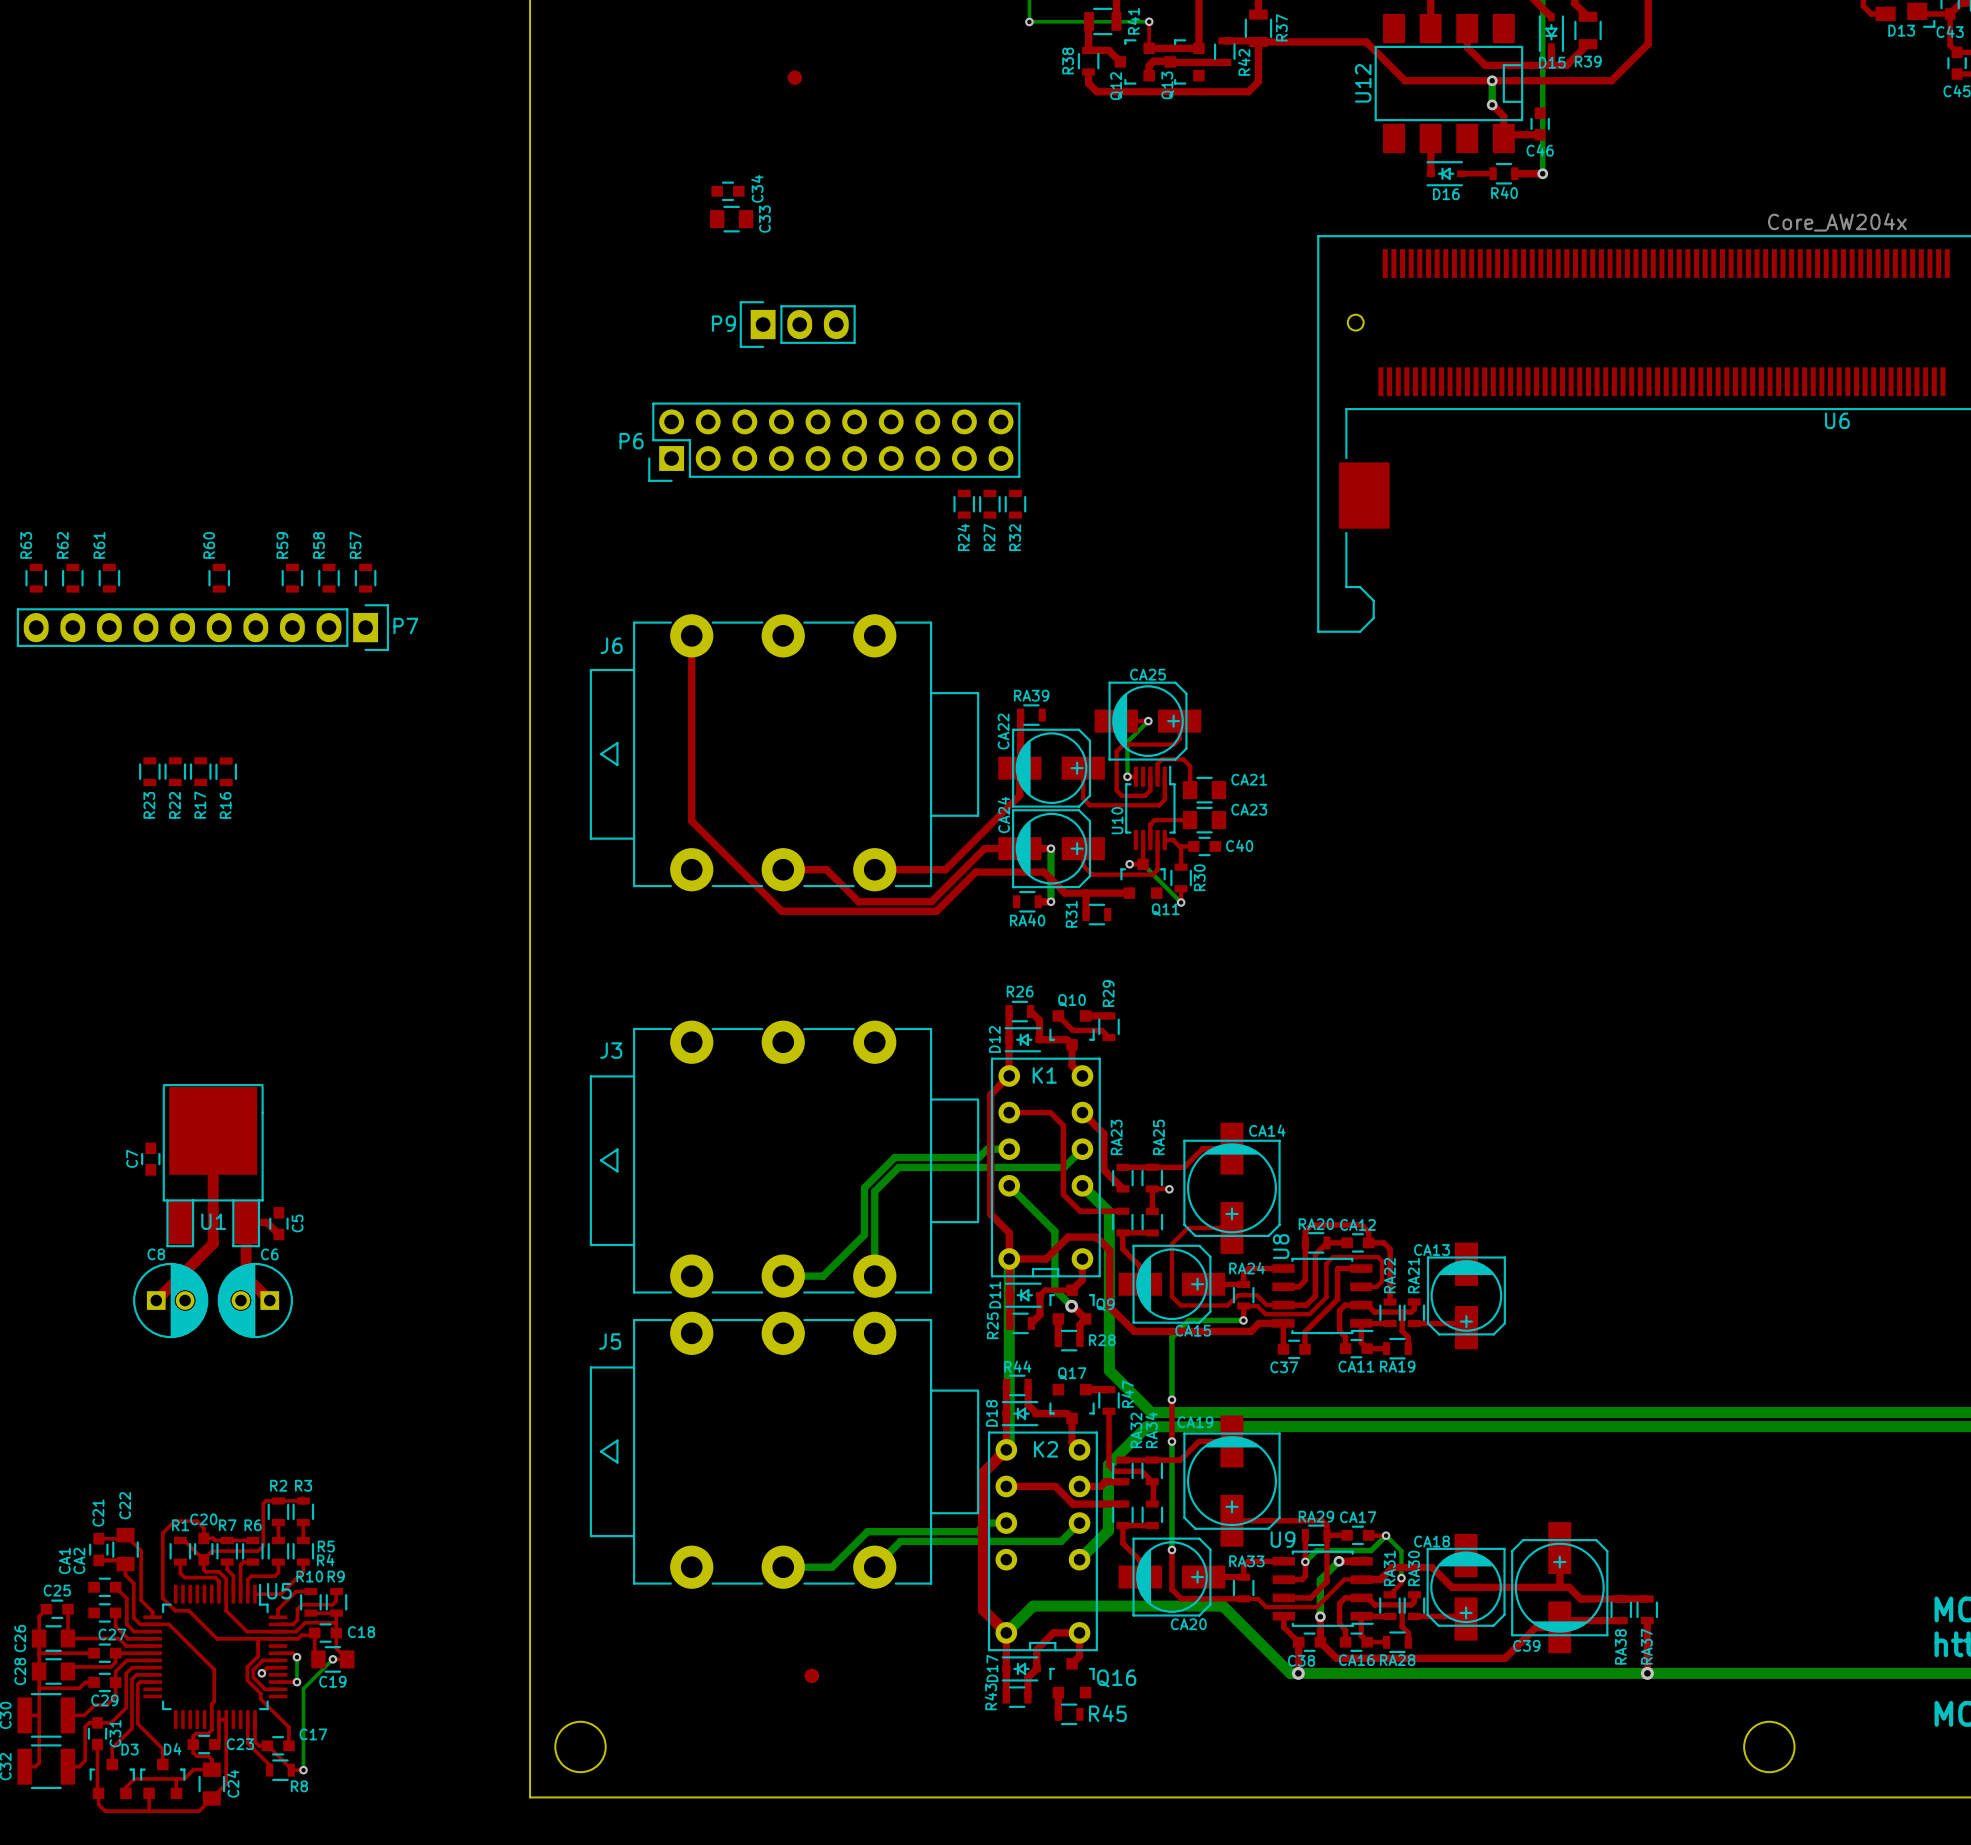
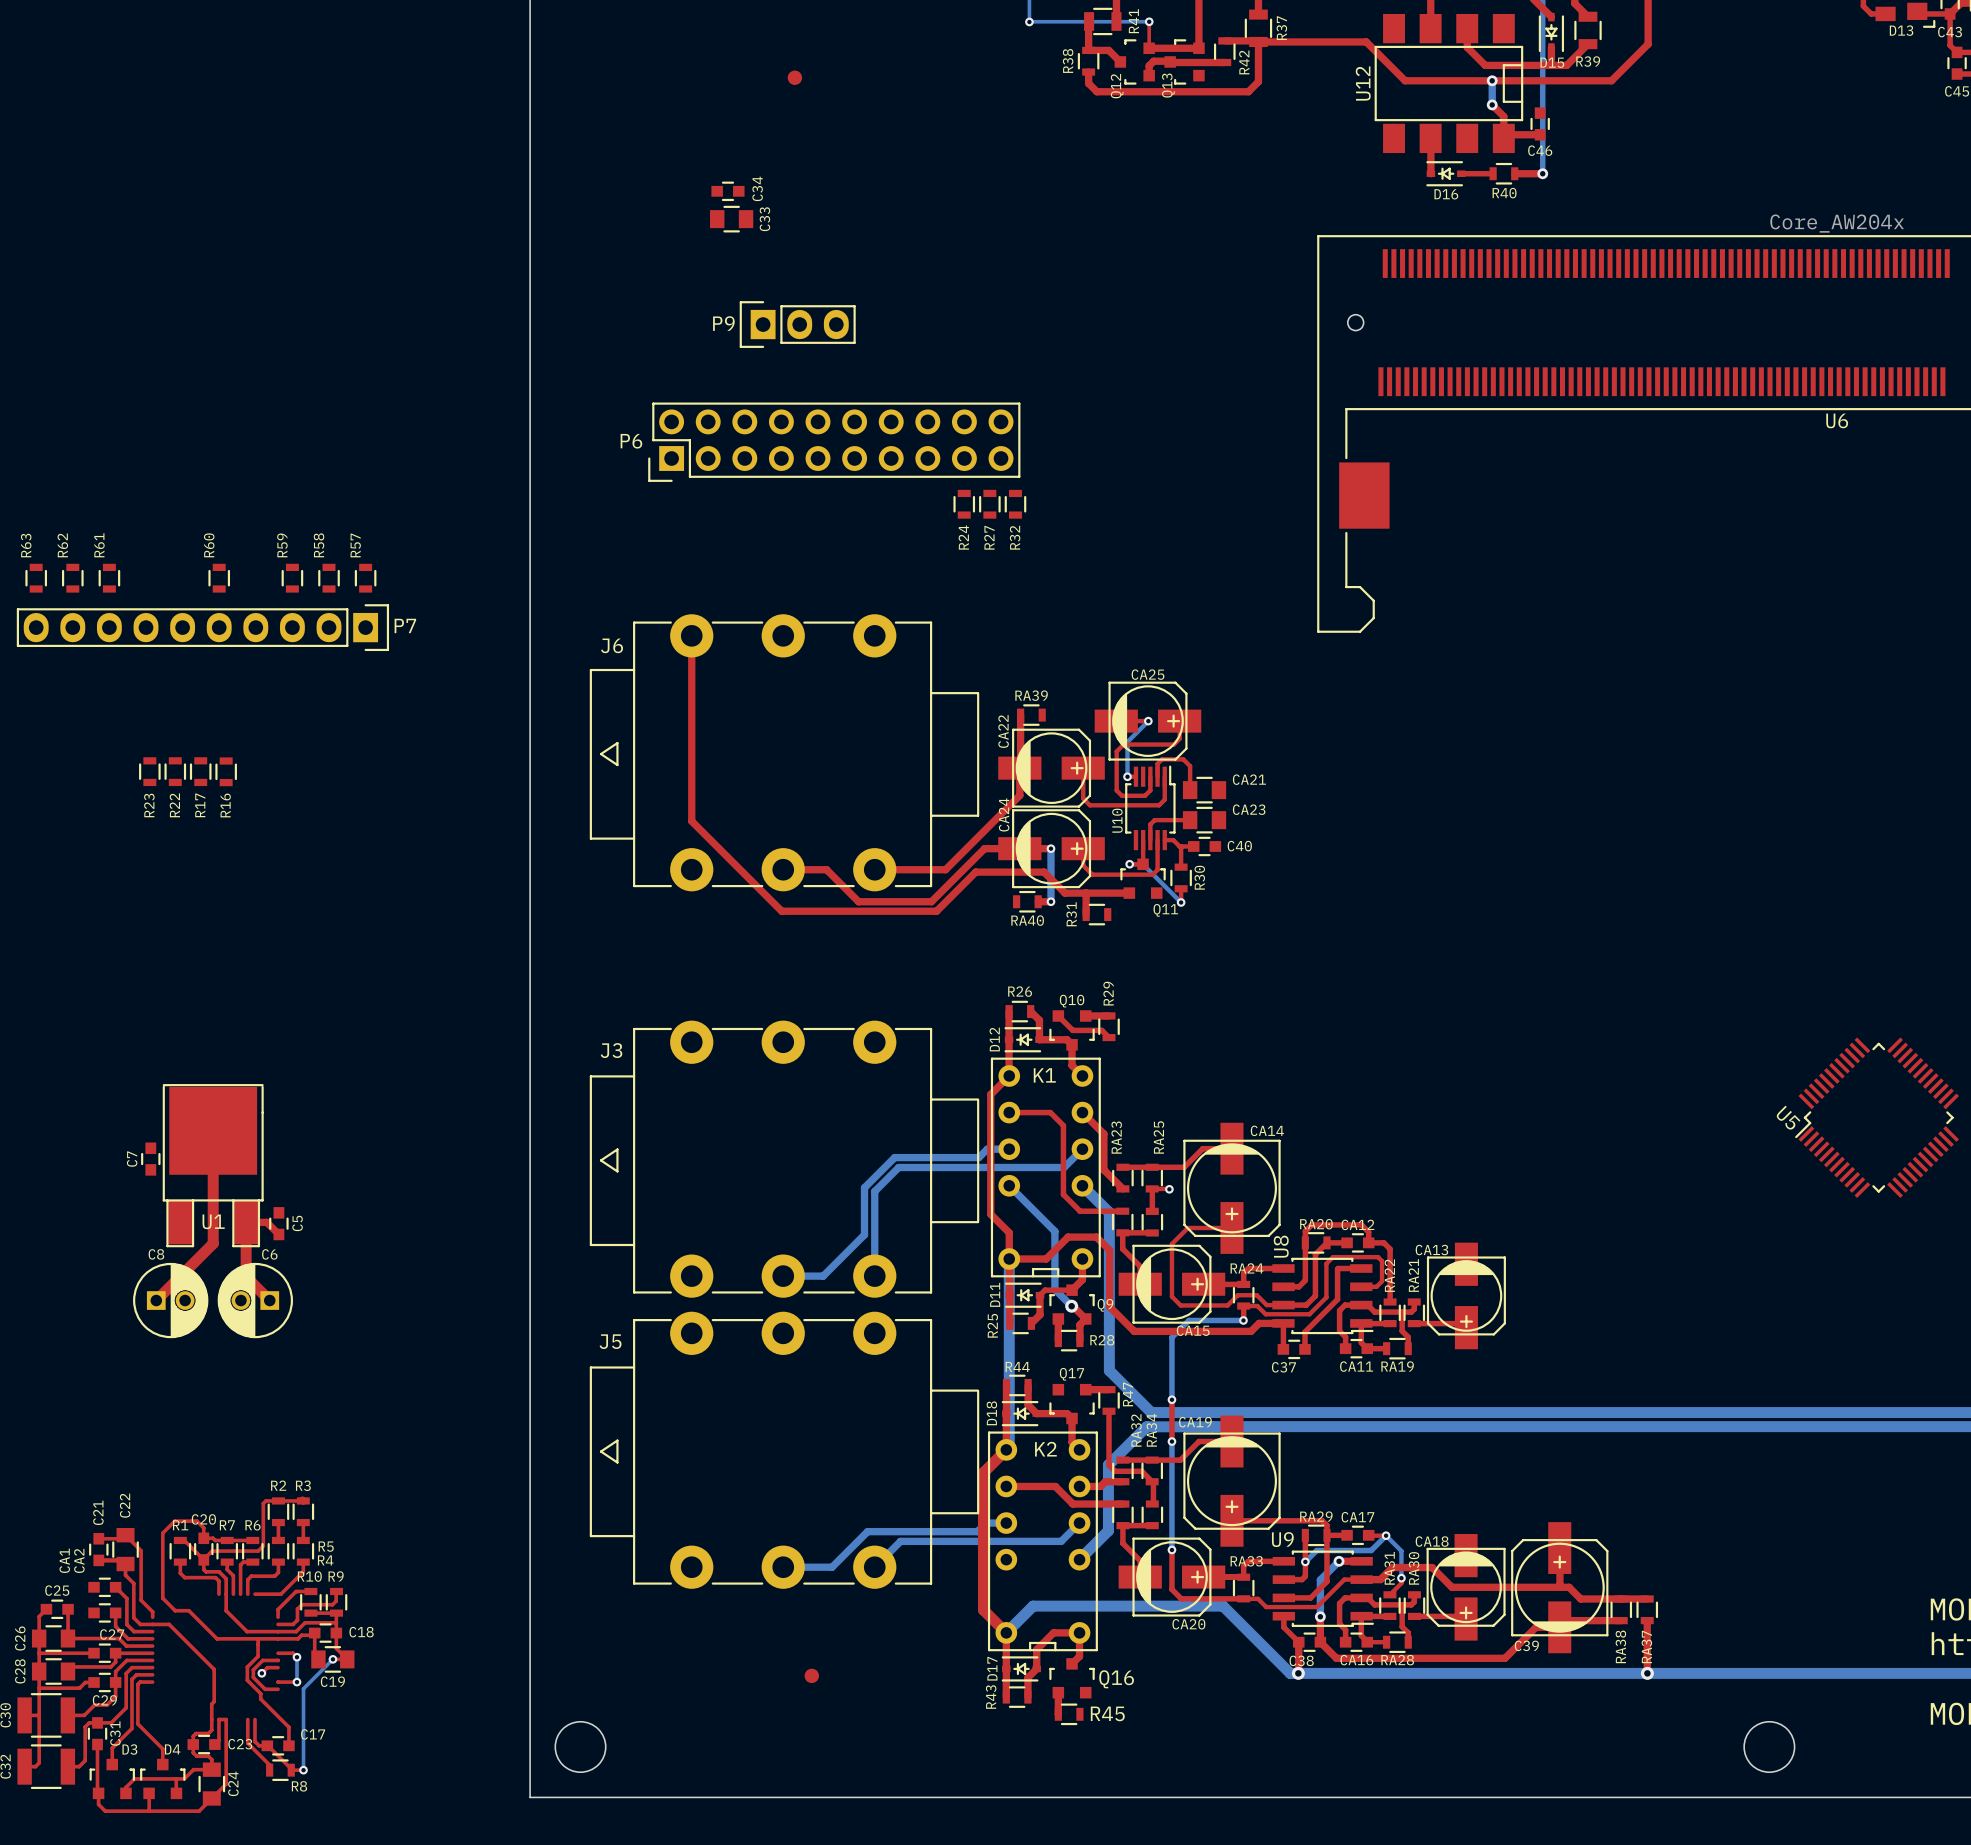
U5 rotation: 0° (215, 1656) -> 135° counterclockwise (1877, 1117)
U5 position: (215, 1656) -> (1877, 1117)

